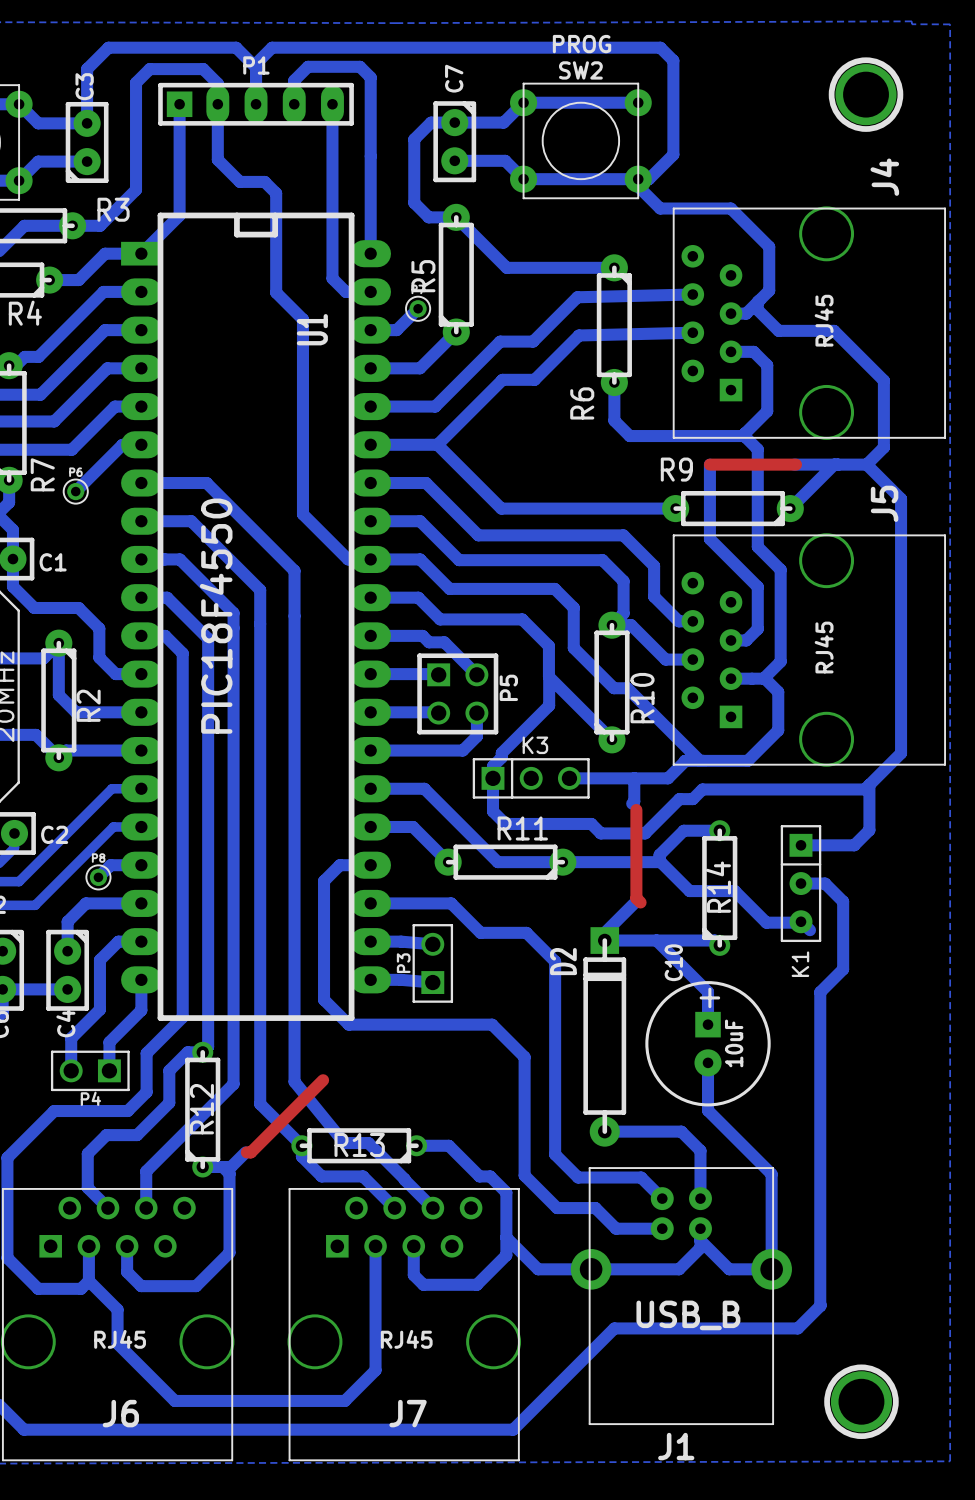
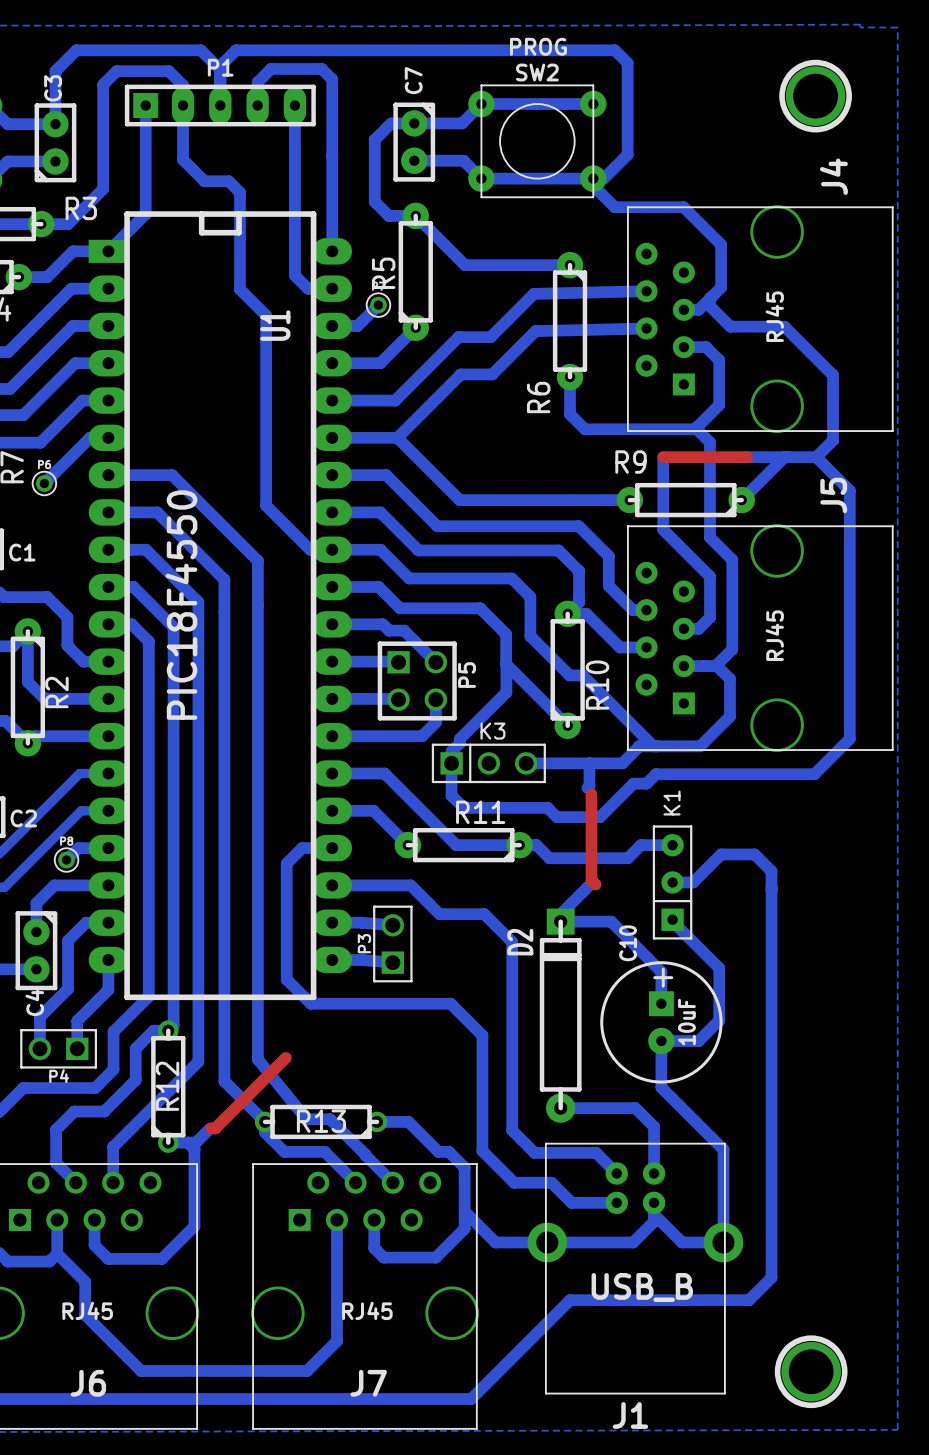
bottom track: (869, 784) (869, 830) (854, 845) (801, 845) -> none
bottom track: (719, 830) (683, 830) (659, 854) (659, 862) -> none
bottom track: (579, 862) (660, 862) (689, 891) (734, 891) (766, 922) (802, 922) (810, 930) -> (536, 845) (549, 858) (627, 858) (641, 845) (672, 845)
bottom track: (801, 883) (825, 883) (843, 901) (843, 969) (820, 992) (820, 1306) -> none
K1 rotation: 0° (801, 883) -> 180° (672, 882)
K1 position: (801, 883) -> (672, 882)
R14: (719, 888) -> none
bottom track: none -> (672, 882) (693, 882) (721, 854) (754, 854) (771, 871) (771, 1277)
bottom track: (656, 940) (714, 940) (719, 945) -> none
bottom track: none -> (672, 921) (719, 968) (719, 1020) (698, 1041) (661, 1041)

